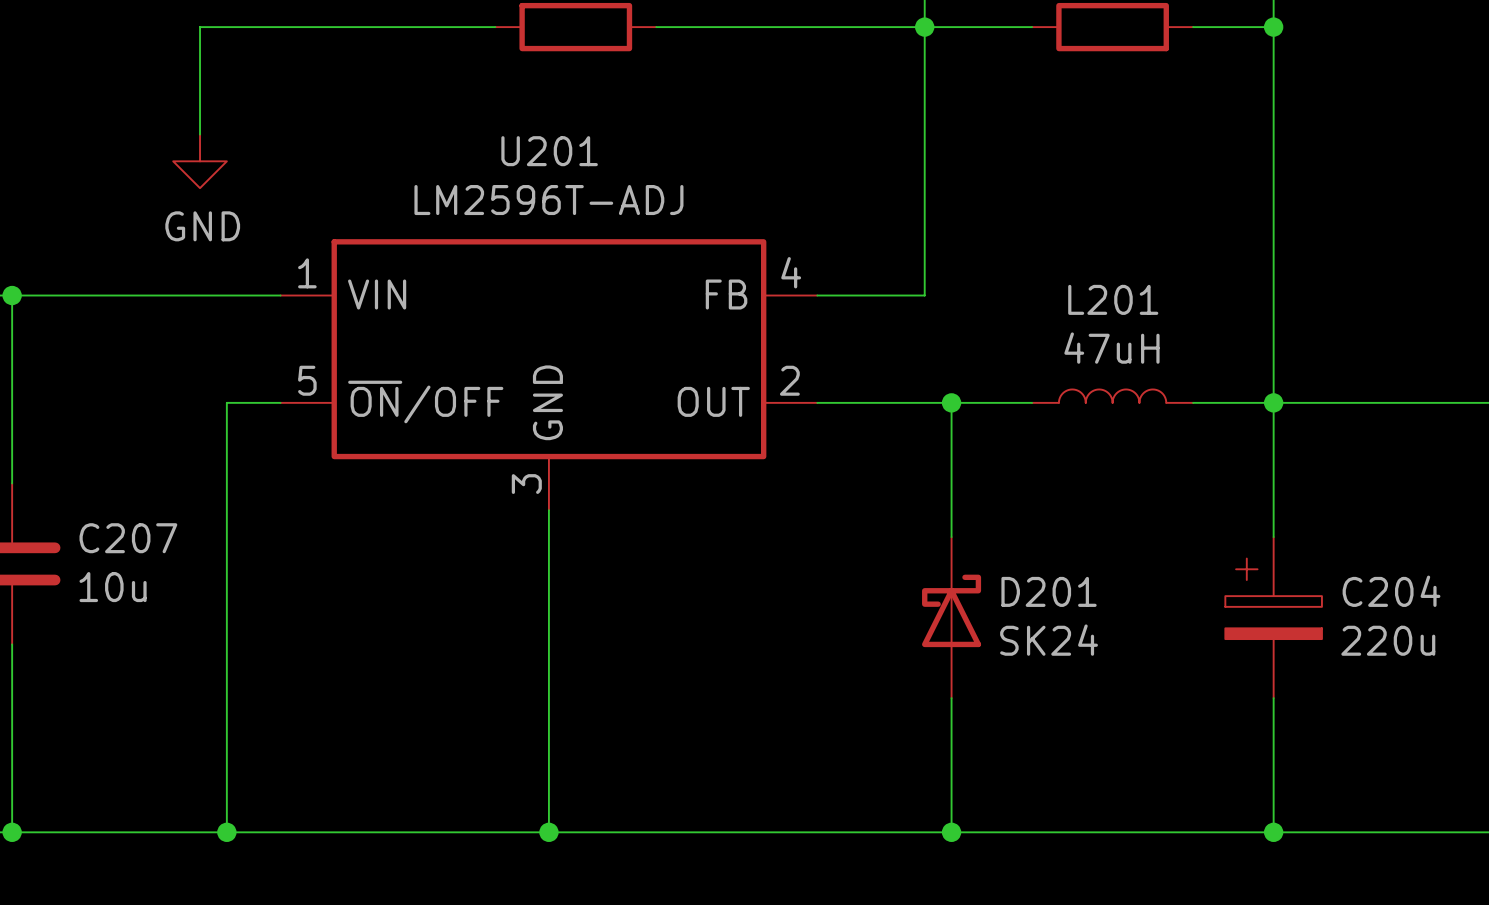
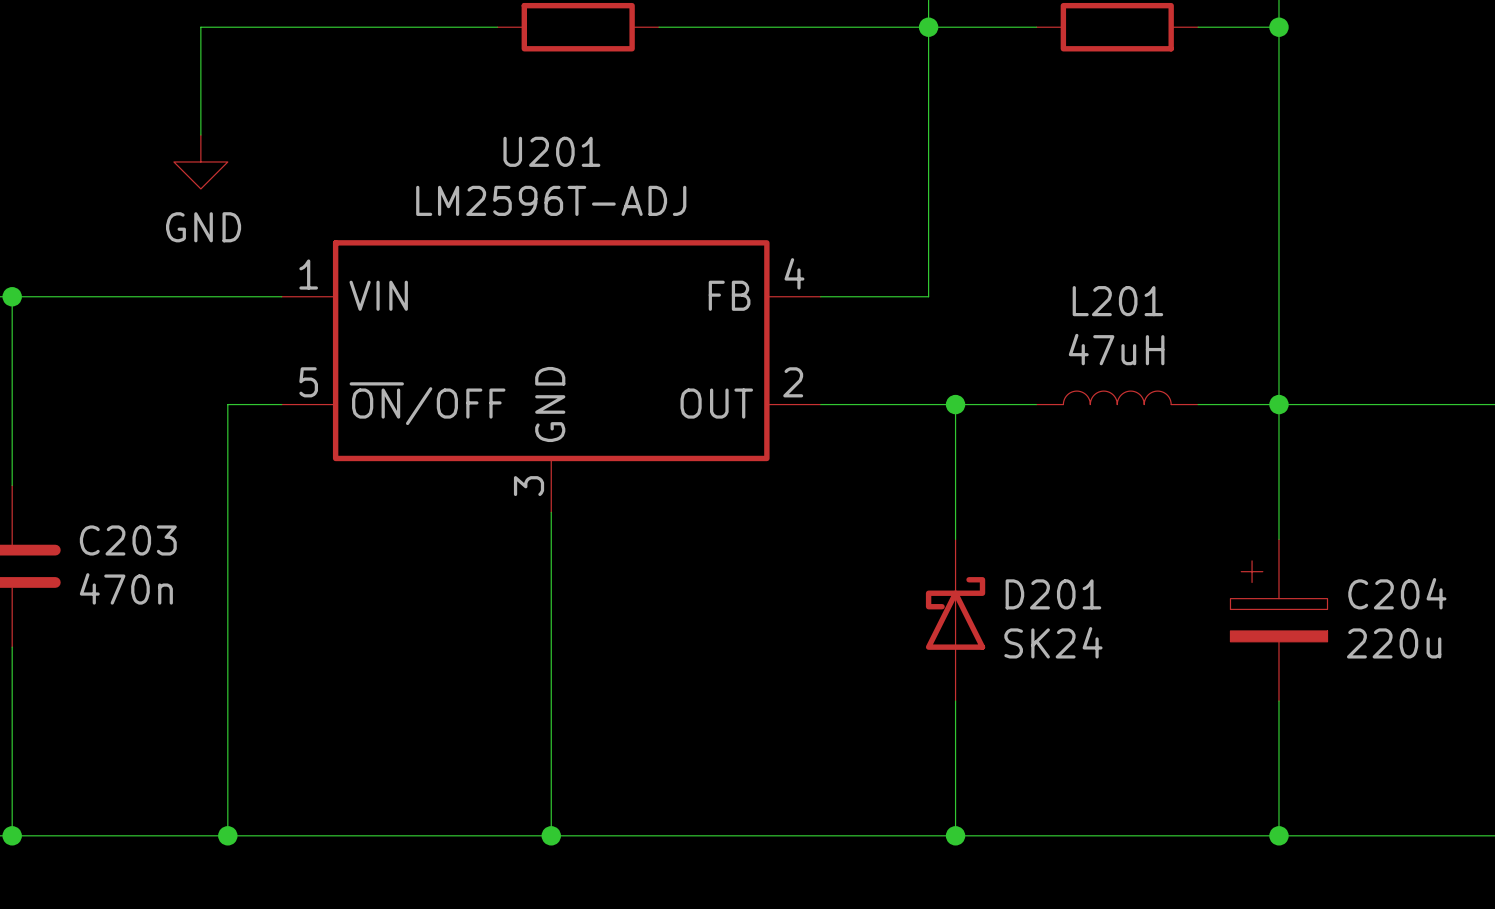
C207 name: C207 (128, 538) -> C203 (128, 540)
C207 value: 10u (113, 587) -> 470n (126, 588)

